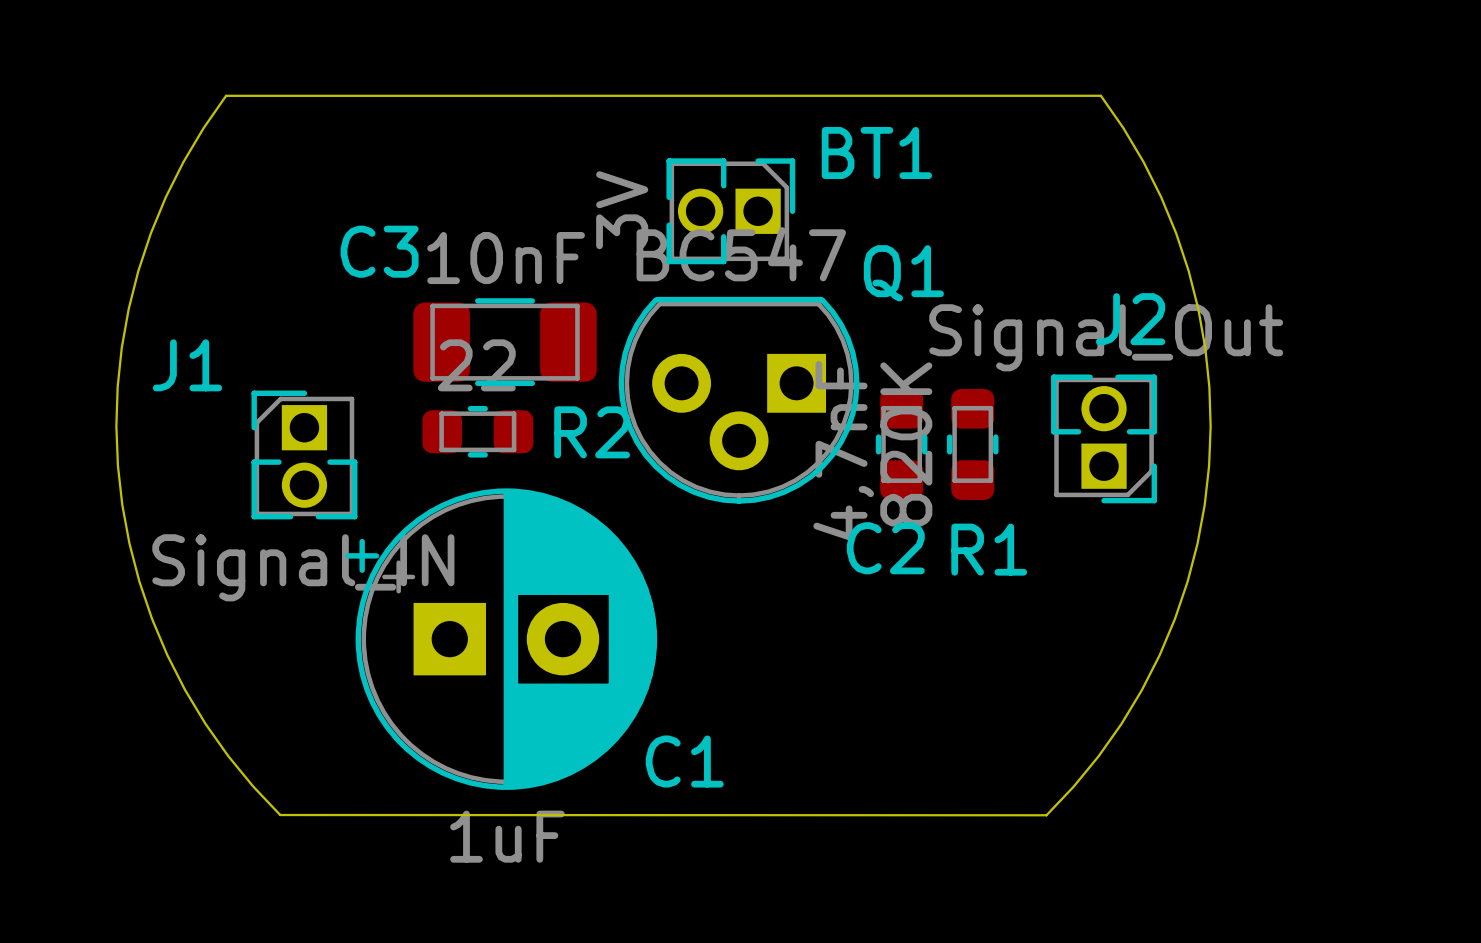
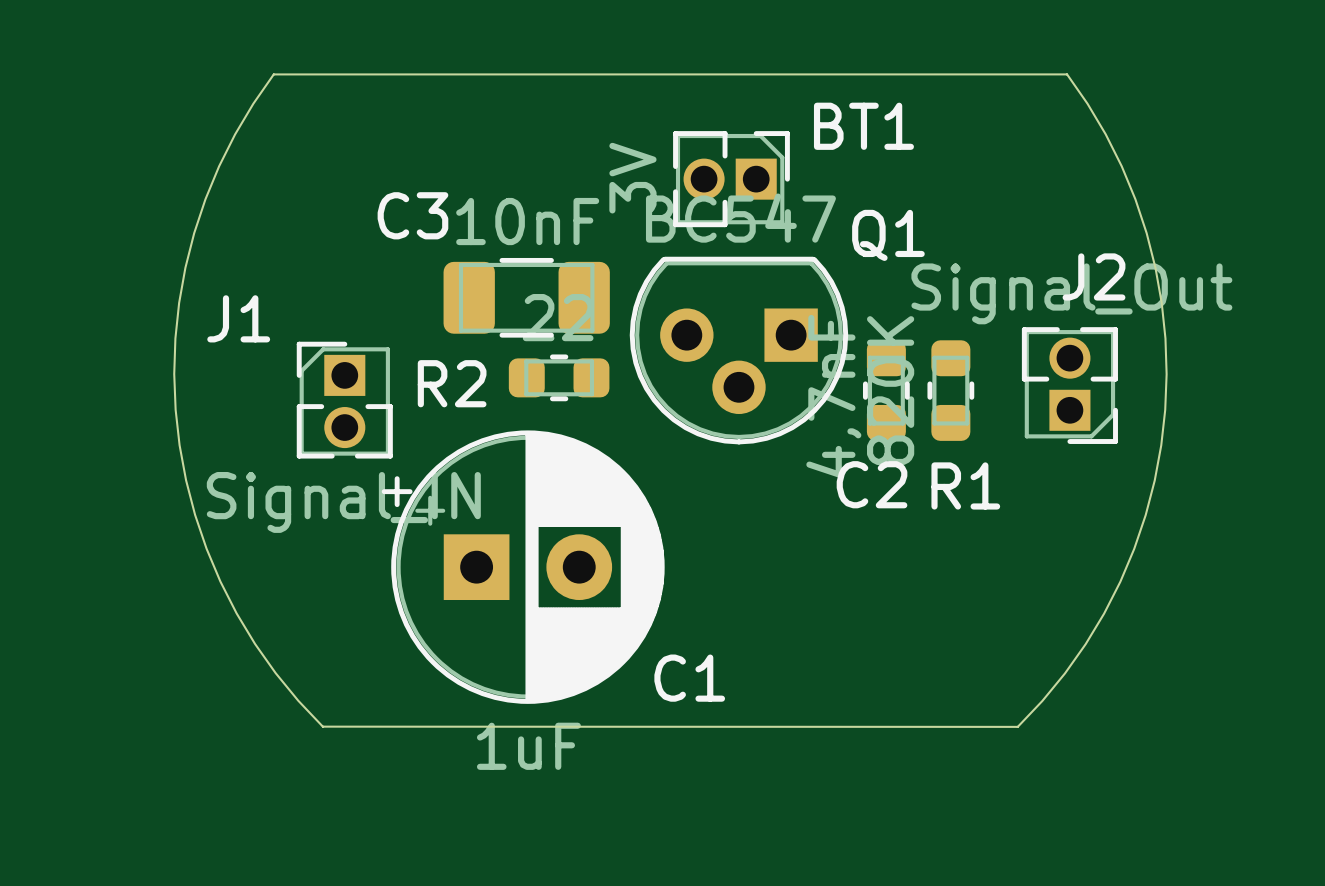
R2 position: (477, 431) -> (559, 377)
R2 name position: R2 (592, 432) -> R2 (452, 383)

